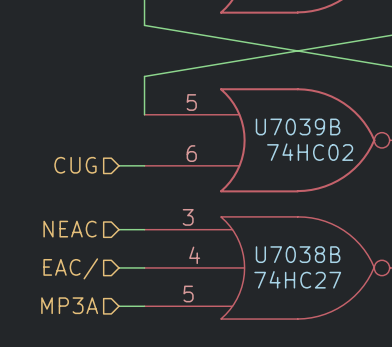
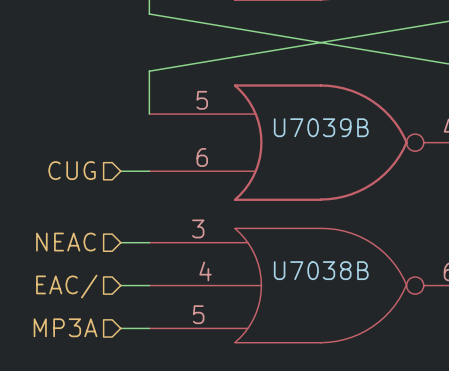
U7039B value: 74HC02 (310, 152) -> none
U7038B value: 74HC27 (297, 279) -> none

